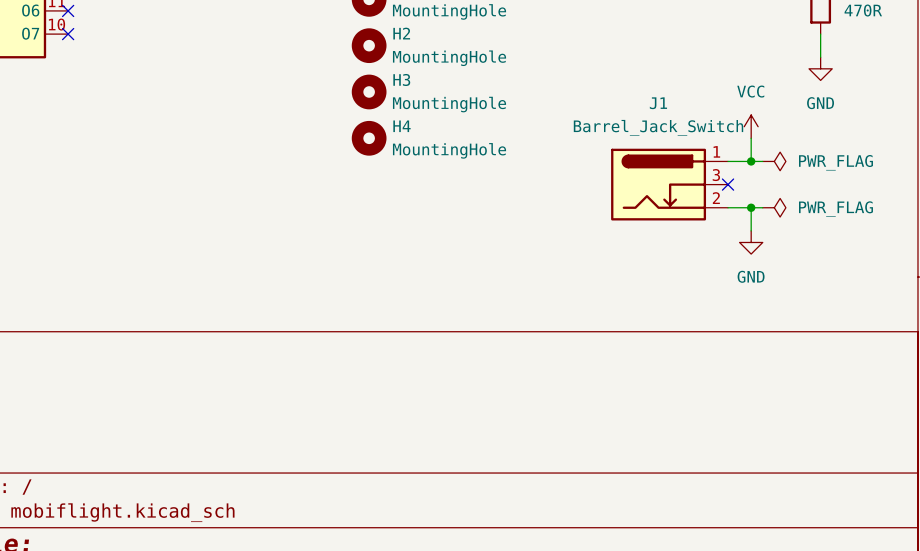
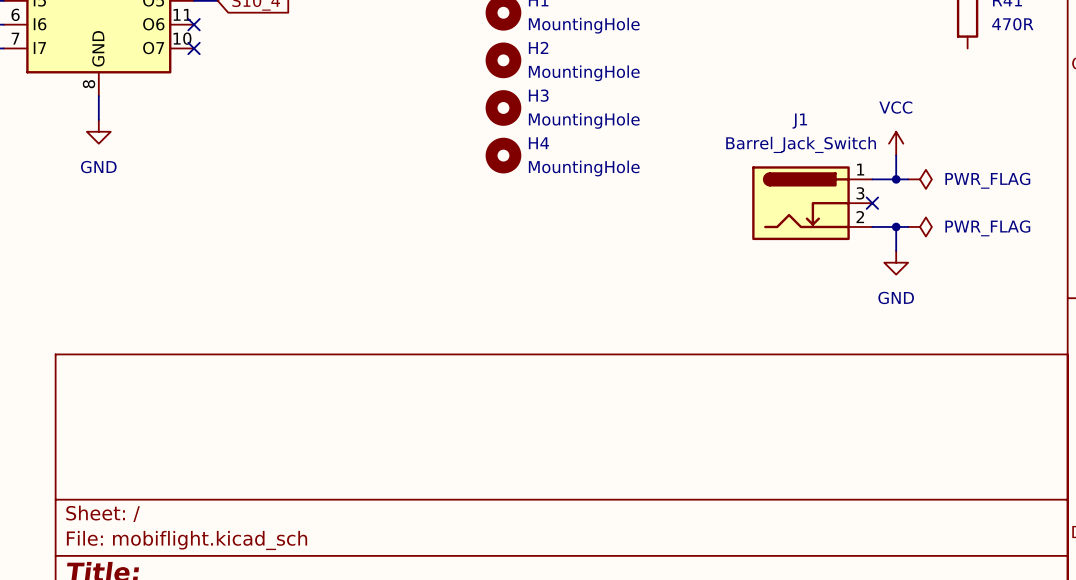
wire: (820, 34) (820, 57) -> none
power symbol: GND (820, 68) -> none

